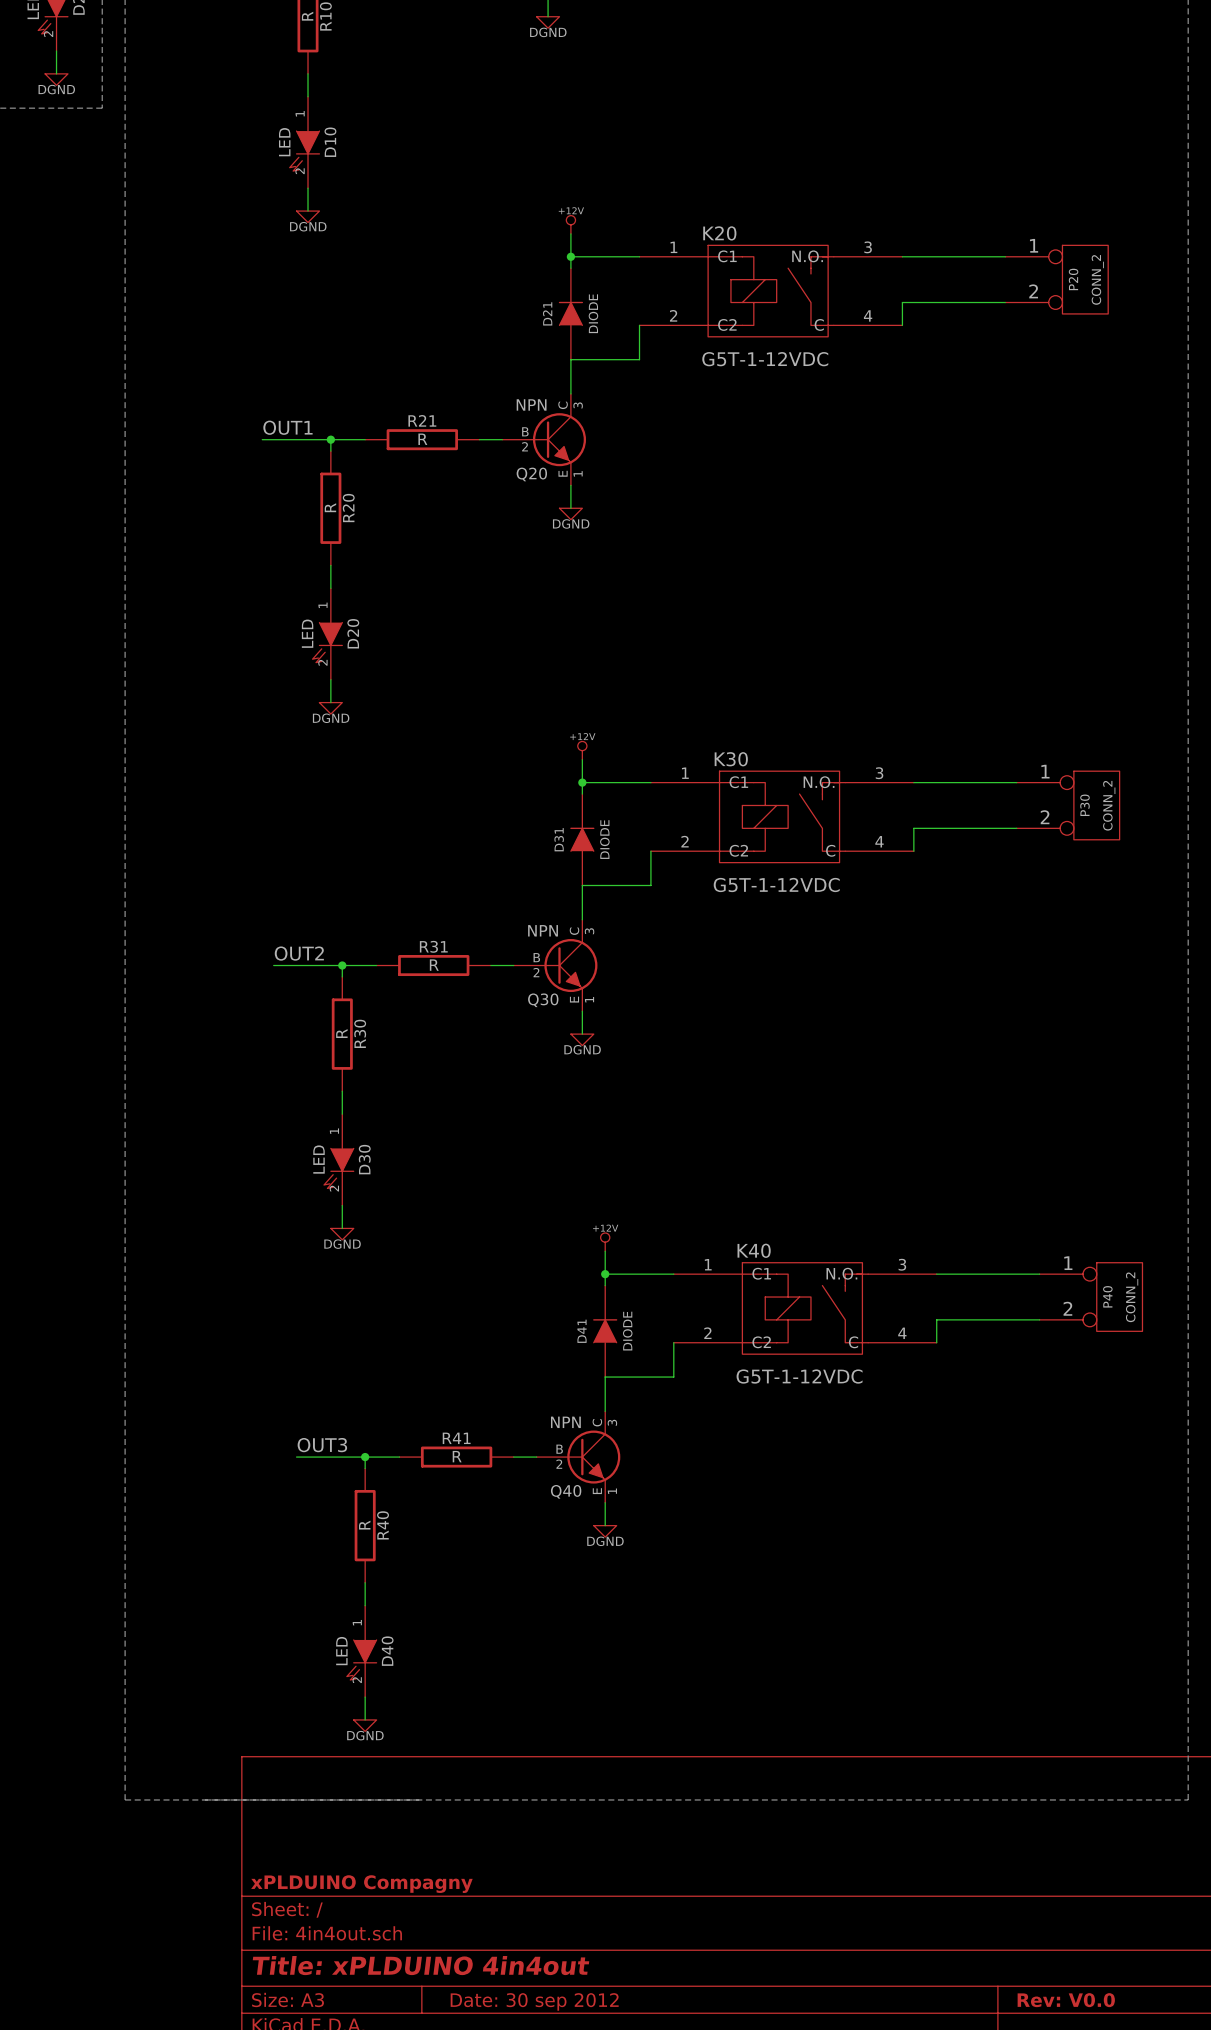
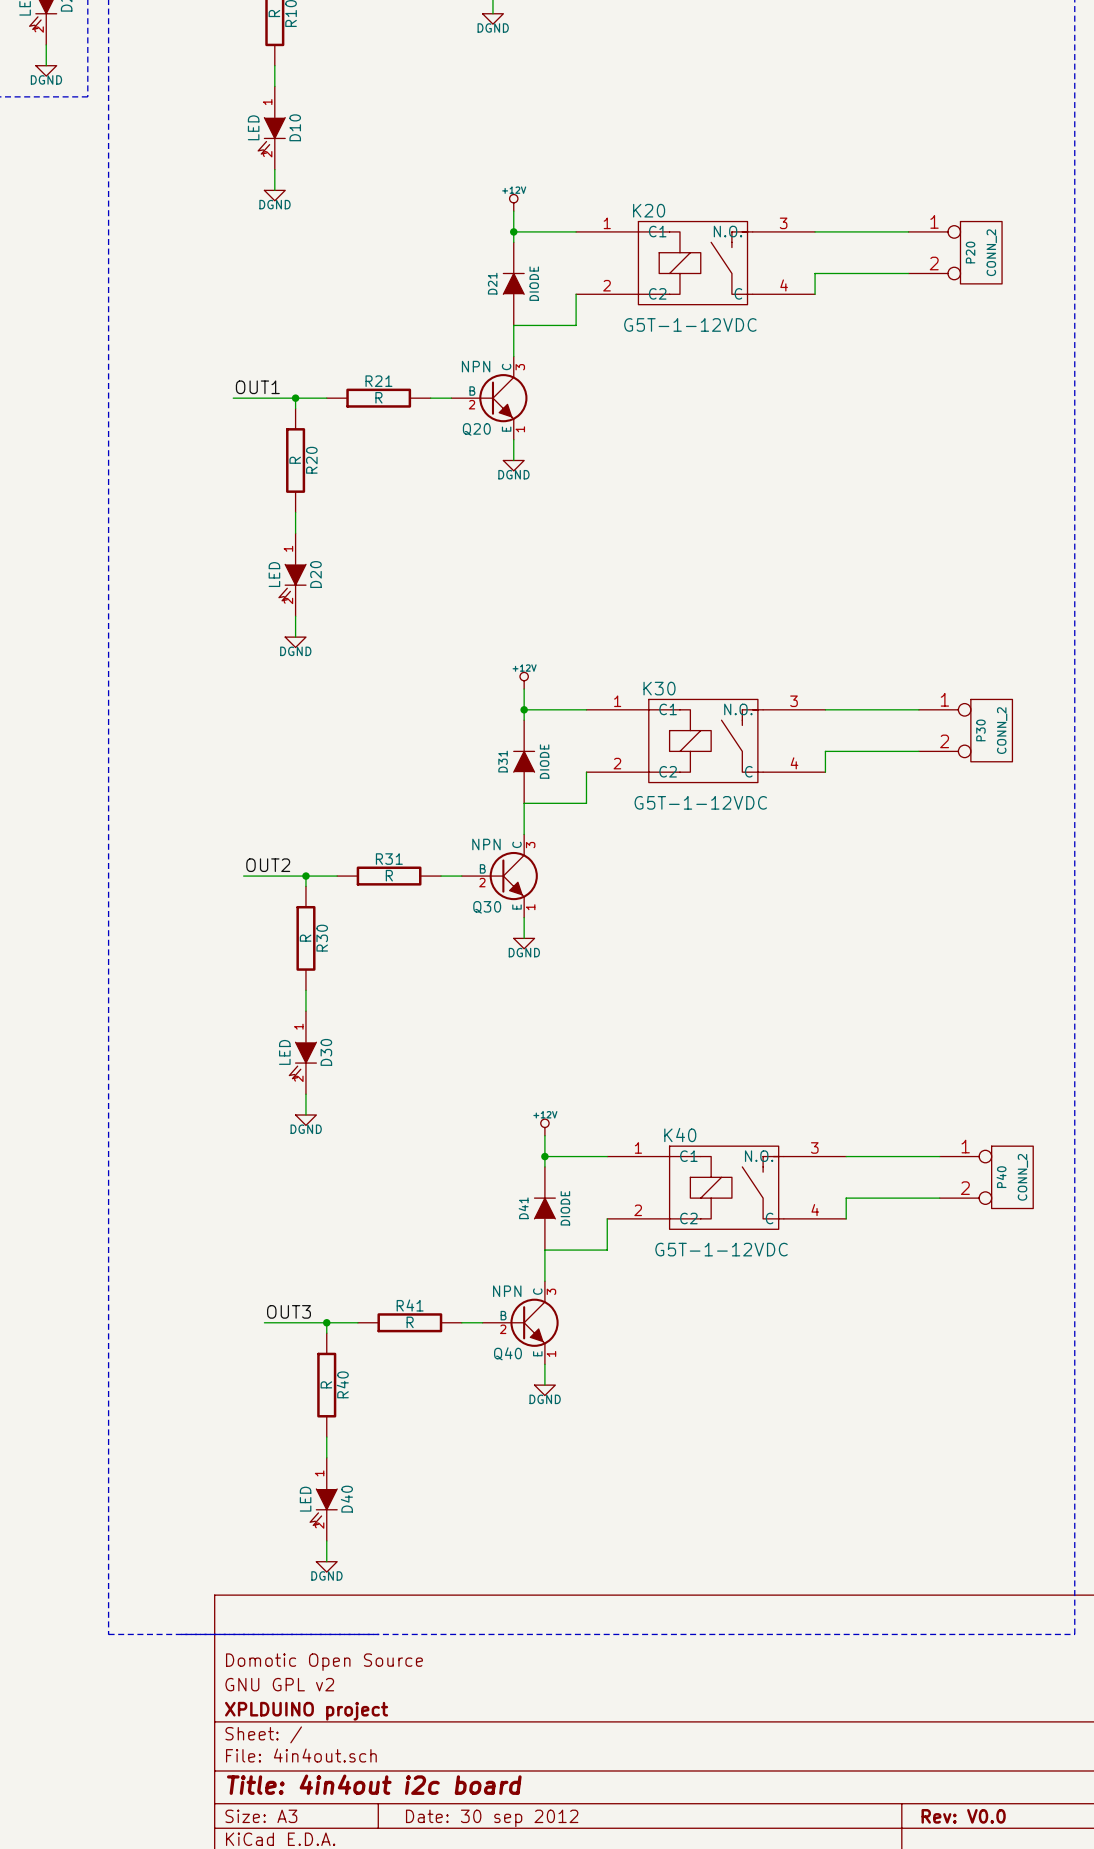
title block: none -> Domotic Open Source (324, 1662)
title block: none -> GNU GPL v2 (279, 1684)
title block: xPLDUINO Compagny (361, 1884) -> XPLDUINO project (306, 1711)
title block: Title: xPLDUINO 4in4out (421, 1965) -> Title: 4in4out i2c board (374, 1784)

